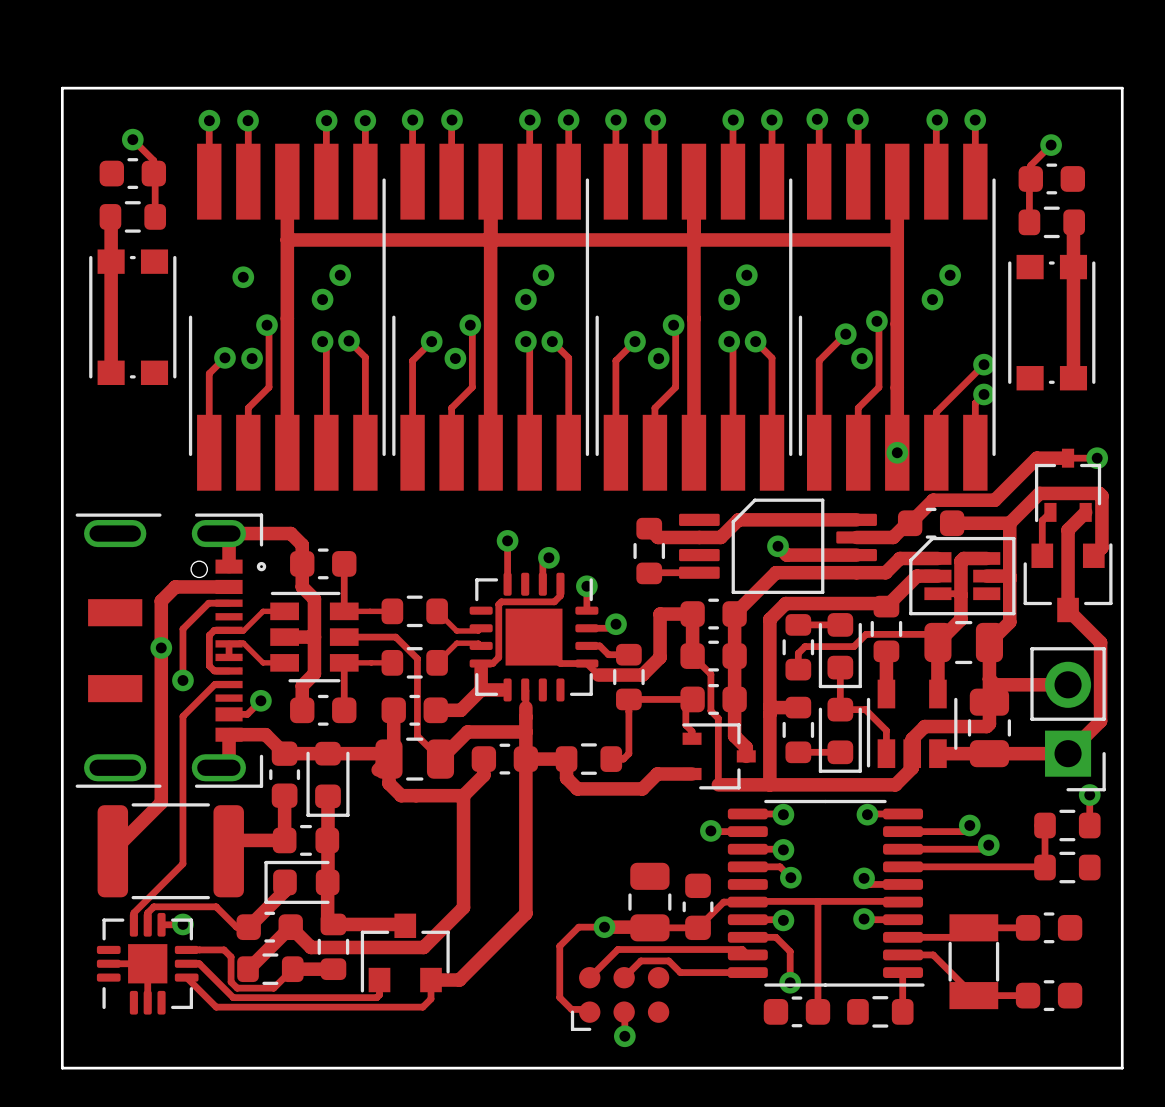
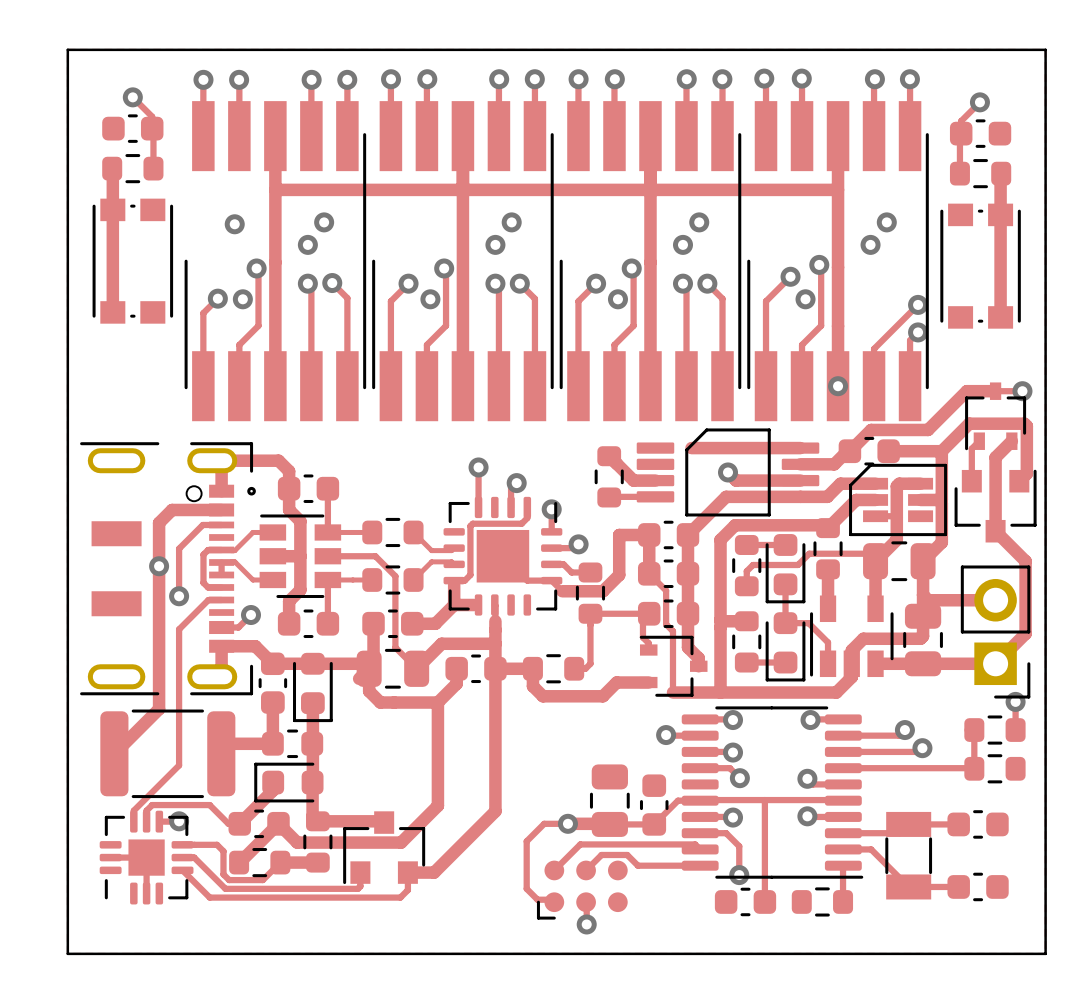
track: (738, 519) (720, 537) (658, 537) -> (655, 480) (633, 480) (617, 464)

